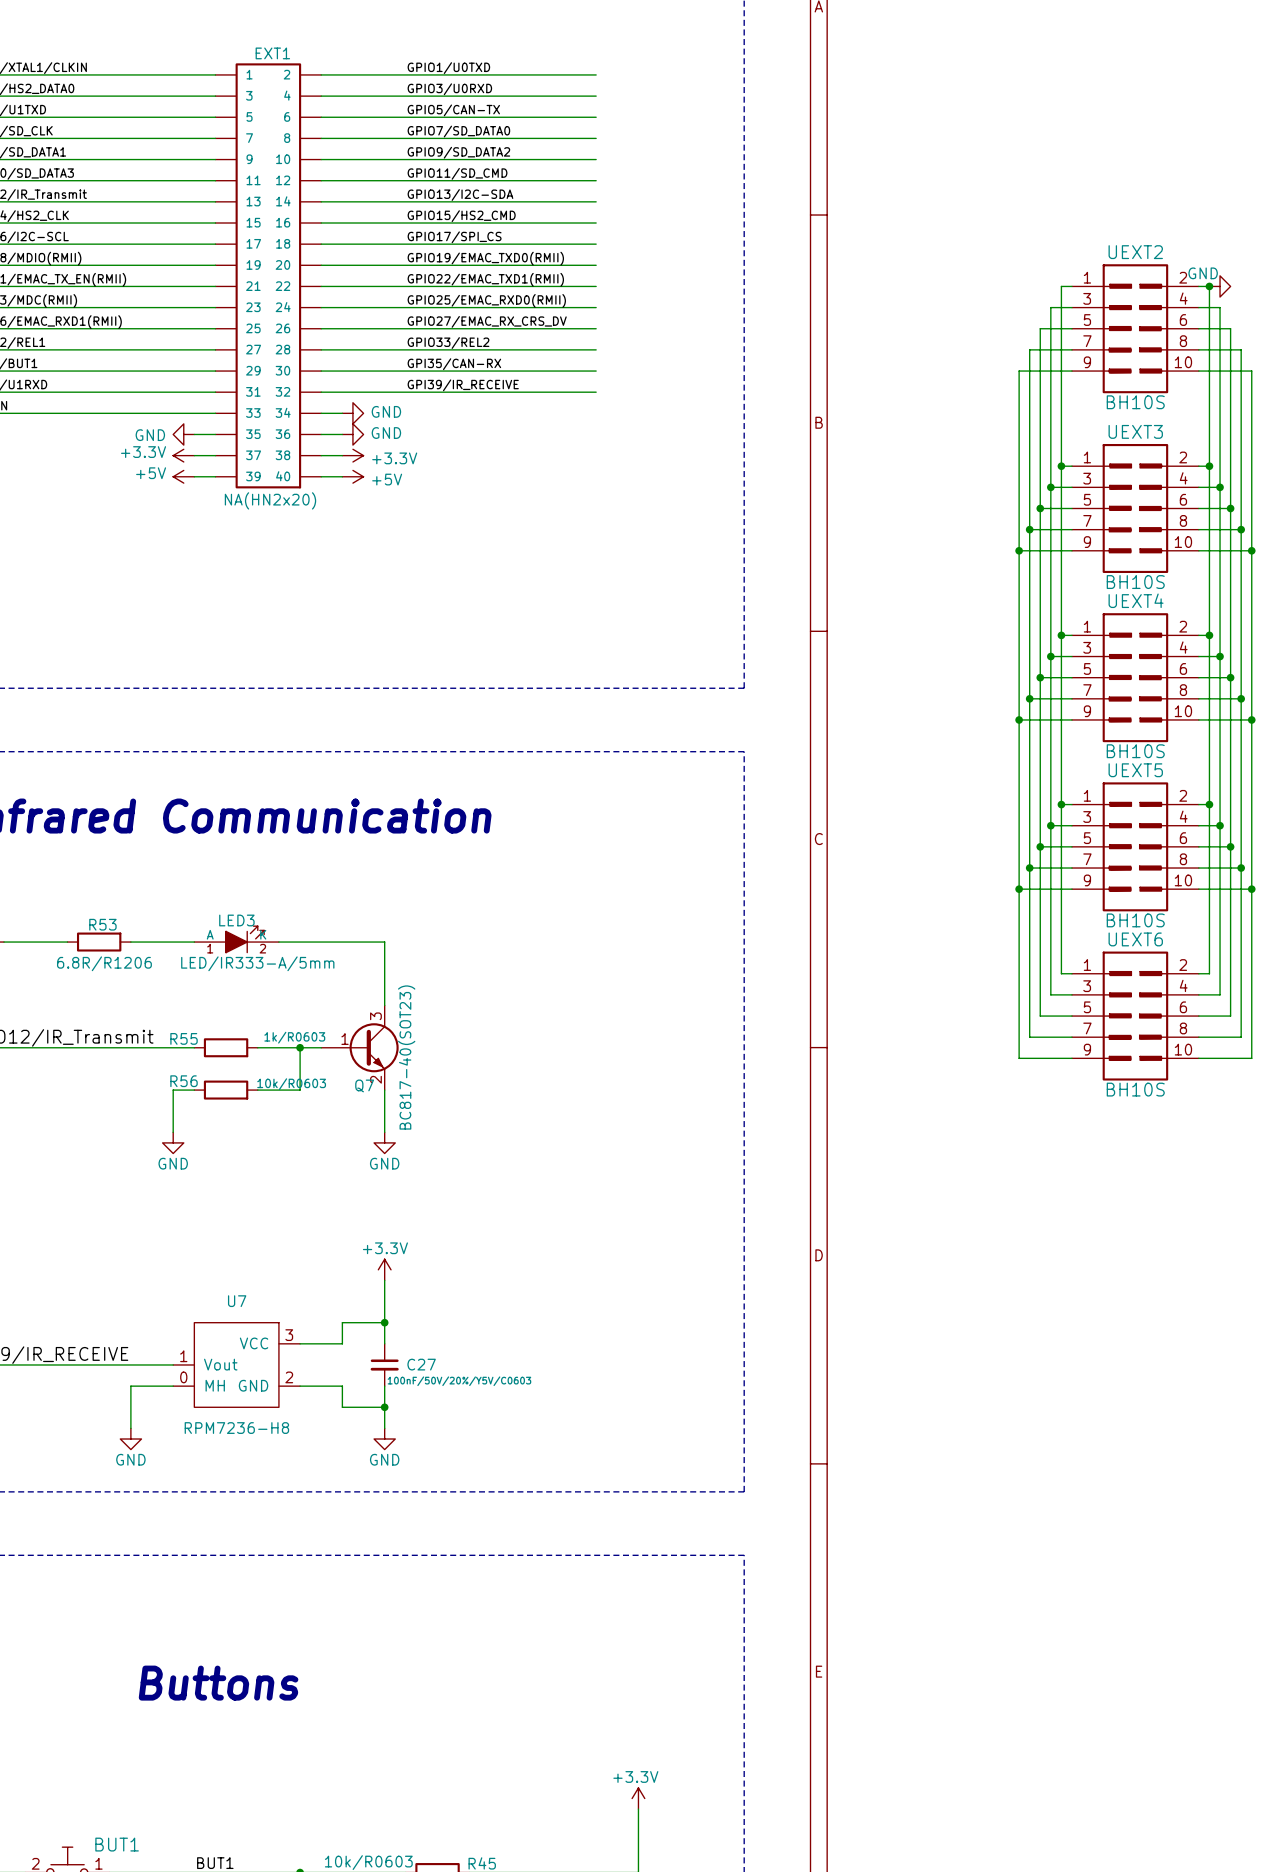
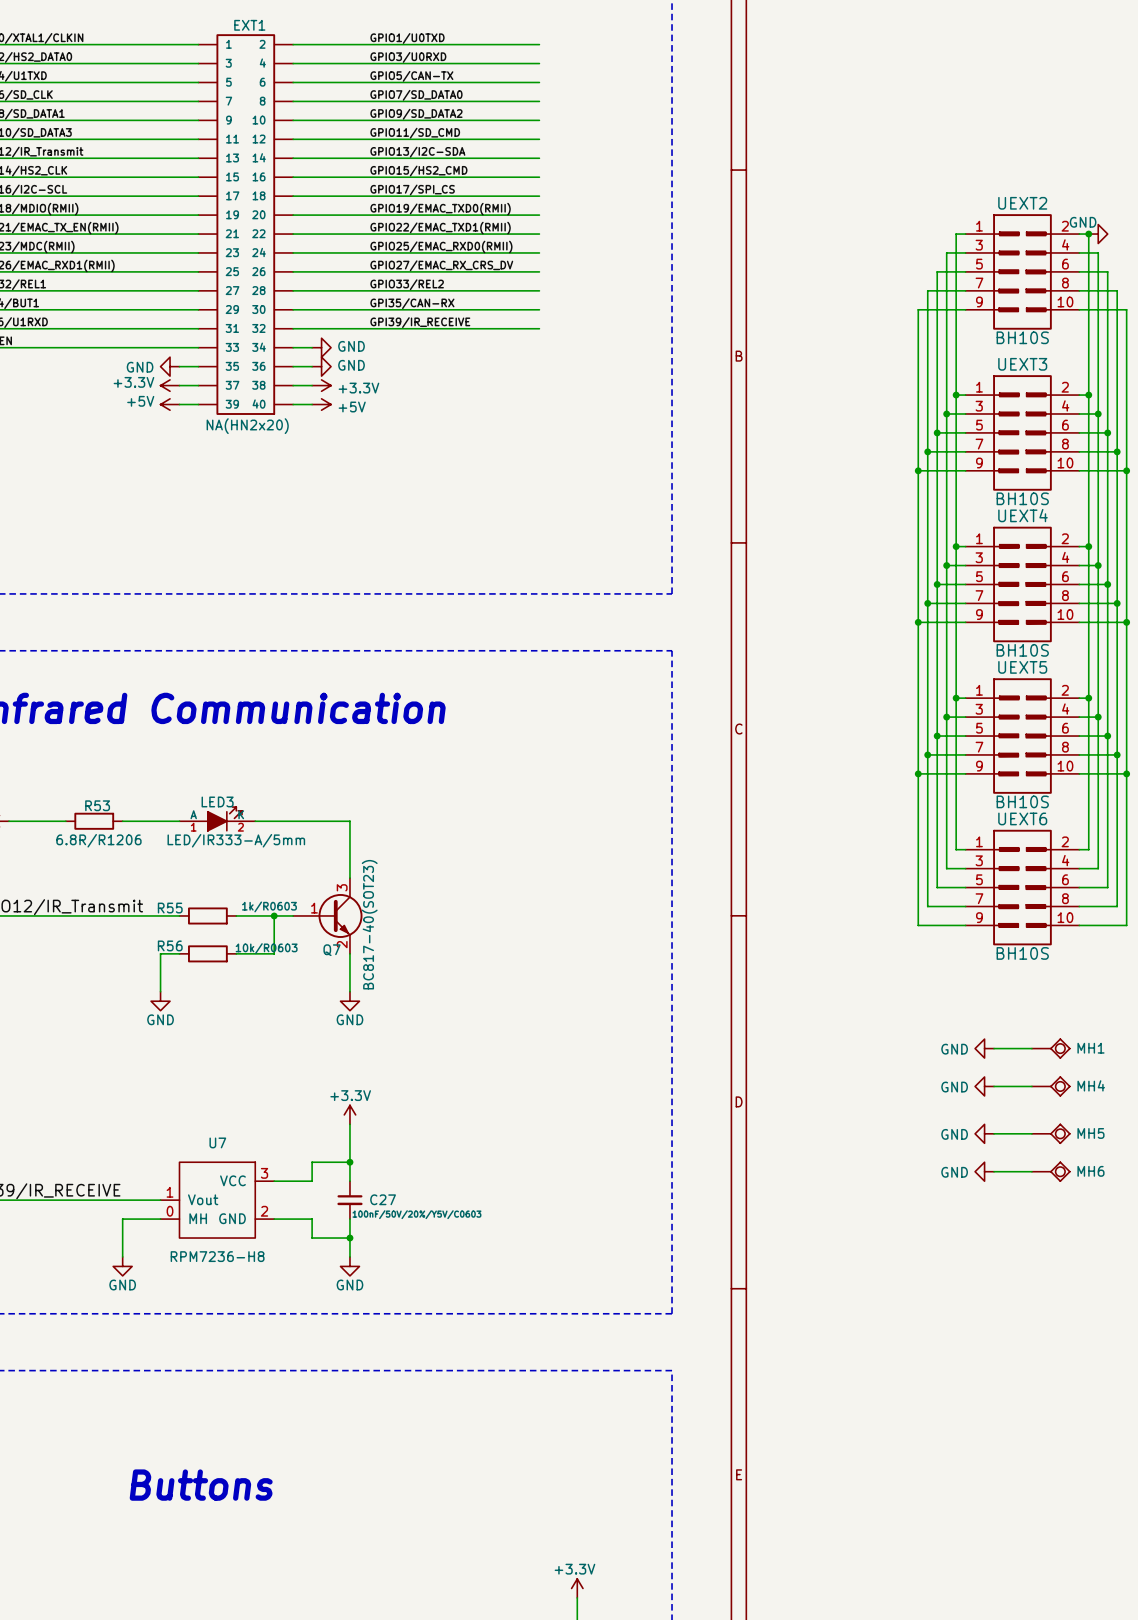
power symbol: none -> GND (984, 1048)
wire: none -> (994, 1048) (1031, 1048)
MH1: none -> (1050, 1048)
power symbol: none -> GND (984, 1086)
wire: none -> (994, 1086) (1031, 1086)
MH4: none -> (1050, 1086)
power symbol: none -> GND (984, 1133)
wire: none -> (994, 1133) (1031, 1133)
MH5: none -> (1050, 1133)
power symbol: none -> GND (984, 1171)
wire: none -> (994, 1171) (1031, 1171)
MH6: none -> (1050, 1171)

